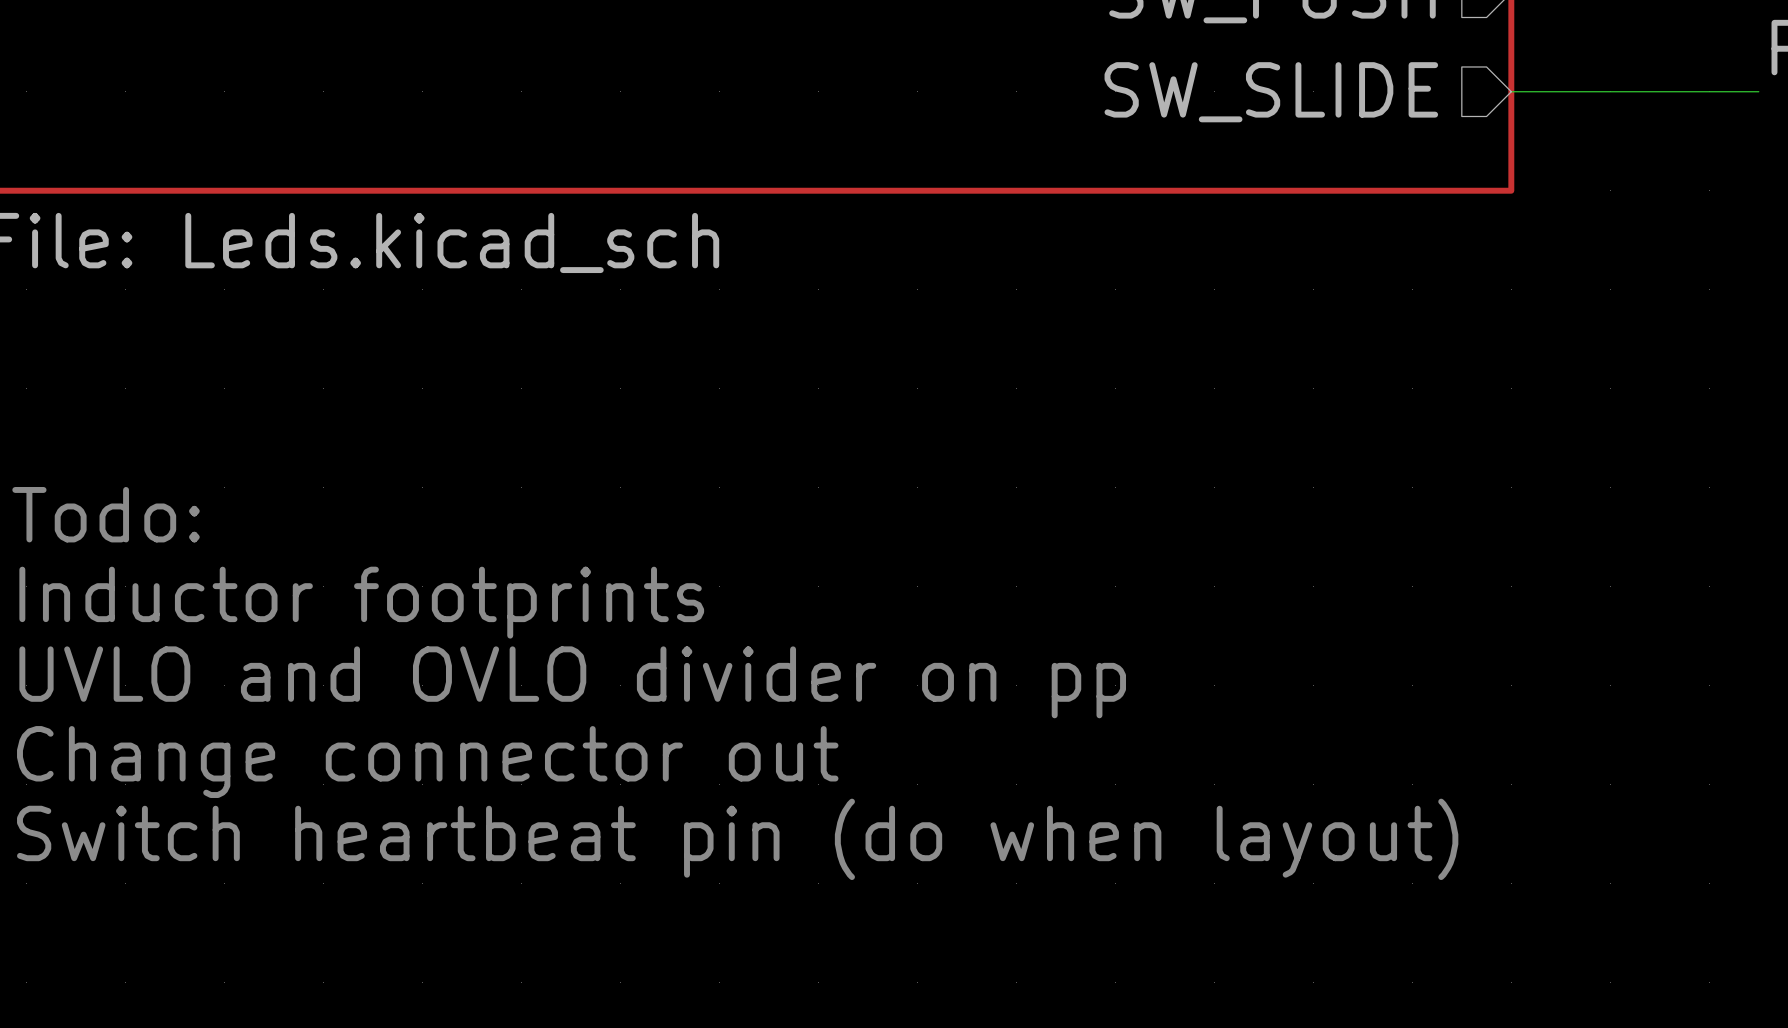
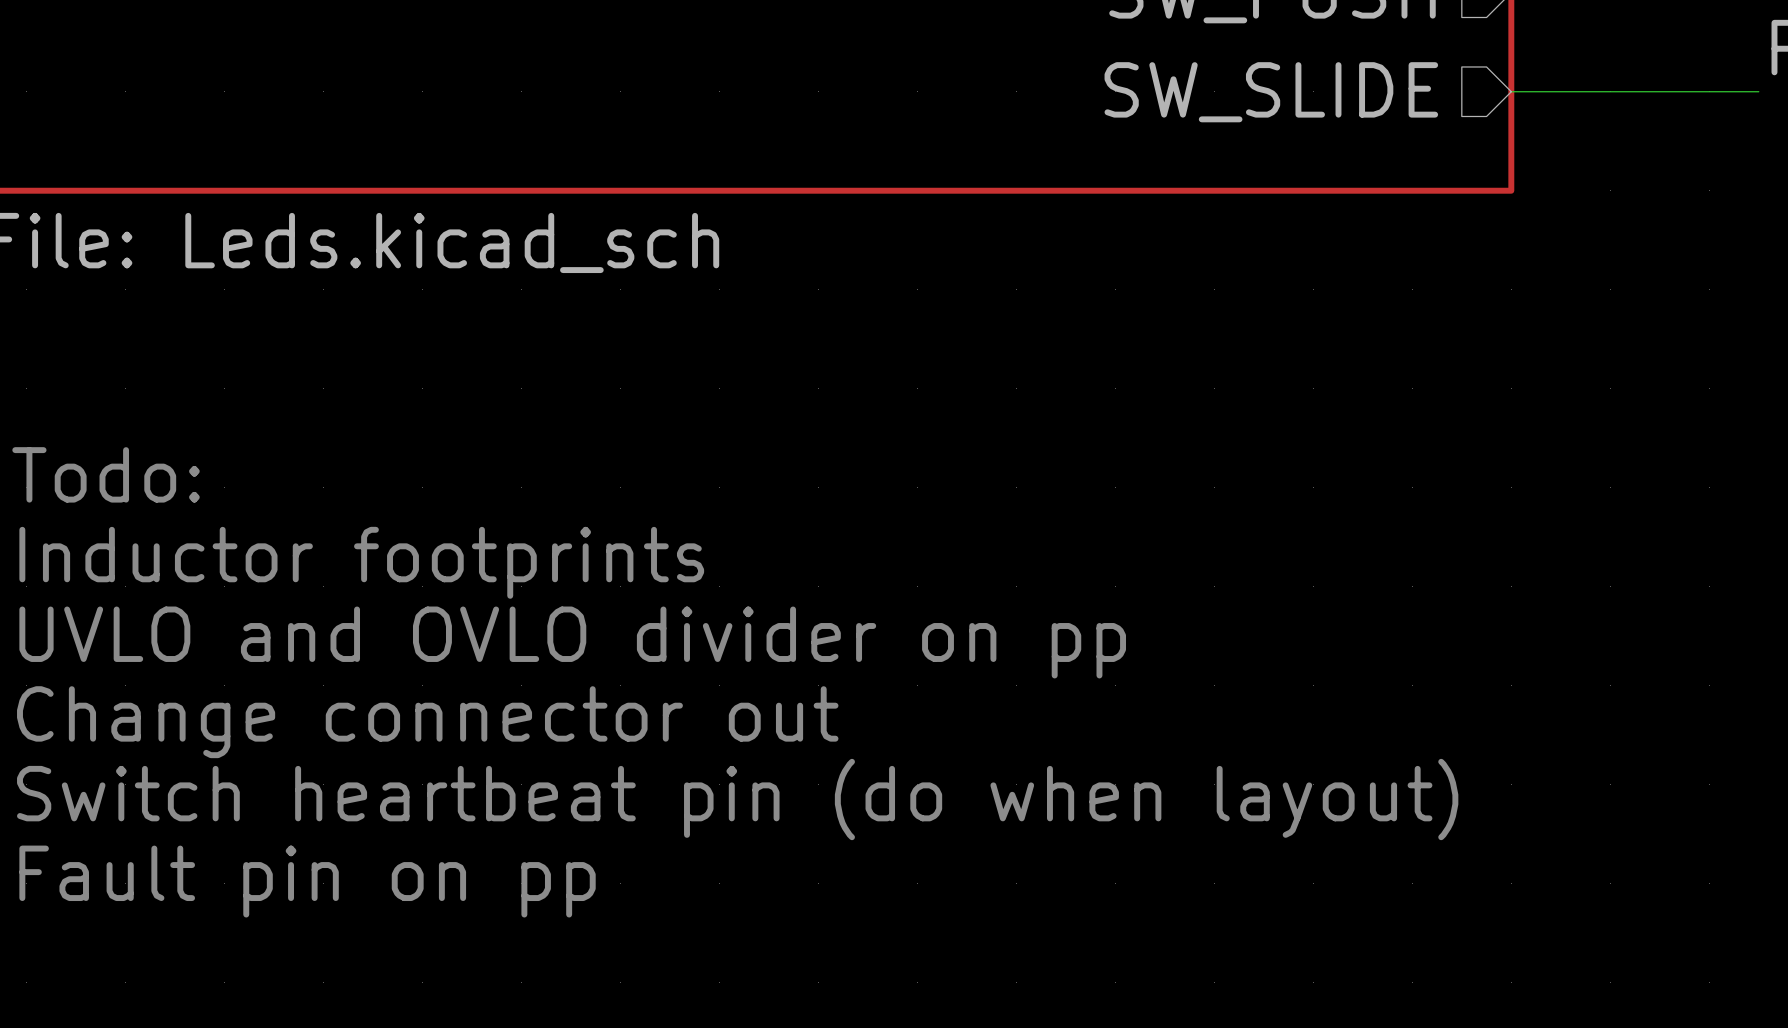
text position: Todo: (106, 514) -> Todo: (106, 474)
text position: Inductor footprints (361, 602) -> Inductor footprints (361, 562)
text position: UVLO and OVLO divider on pp (572, 682) -> UVLO and OVLO divider on pp (572, 642)
text position: Change connector out (427, 762) -> Change connector out (427, 722)
text position: Switch heartbeat pin (do when layout) (737, 839) -> Switch heartbeat pin (do when layout) (737, 799)
text: none -> Fault pin on pp (307, 881)

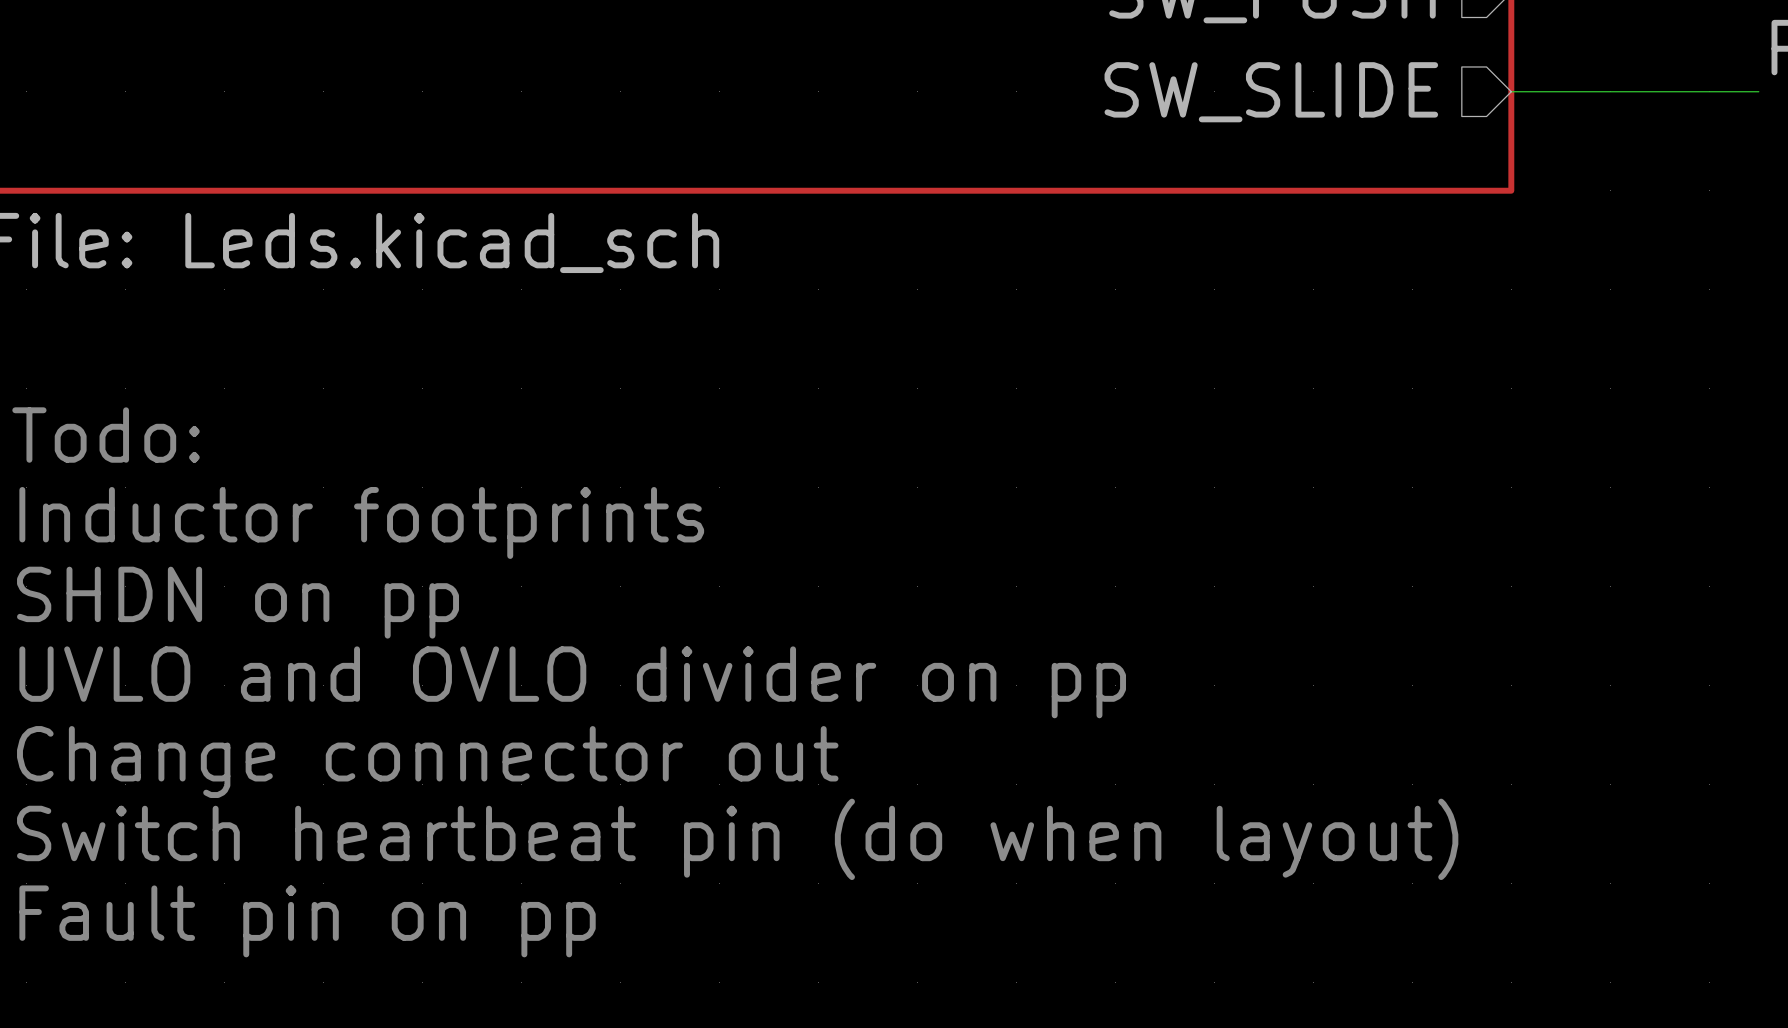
text position: Todo: (106, 474) -> Todo: (106, 435)
text position: Inductor footprints (361, 562) -> Inductor footprints (361, 522)
text: none -> SHDN on pp (238, 602)
text position: UVLO and OVLO divider on pp (572, 642) -> UVLO and OVLO divider on pp (572, 682)
text position: Change connector out (427, 722) -> Change connector out (427, 762)
text position: Switch heartbeat pin (do when layout) (737, 799) -> Switch heartbeat pin (do when layout) (737, 839)
text position: Fault pin on pp (307, 881) -> Fault pin on pp (307, 921)

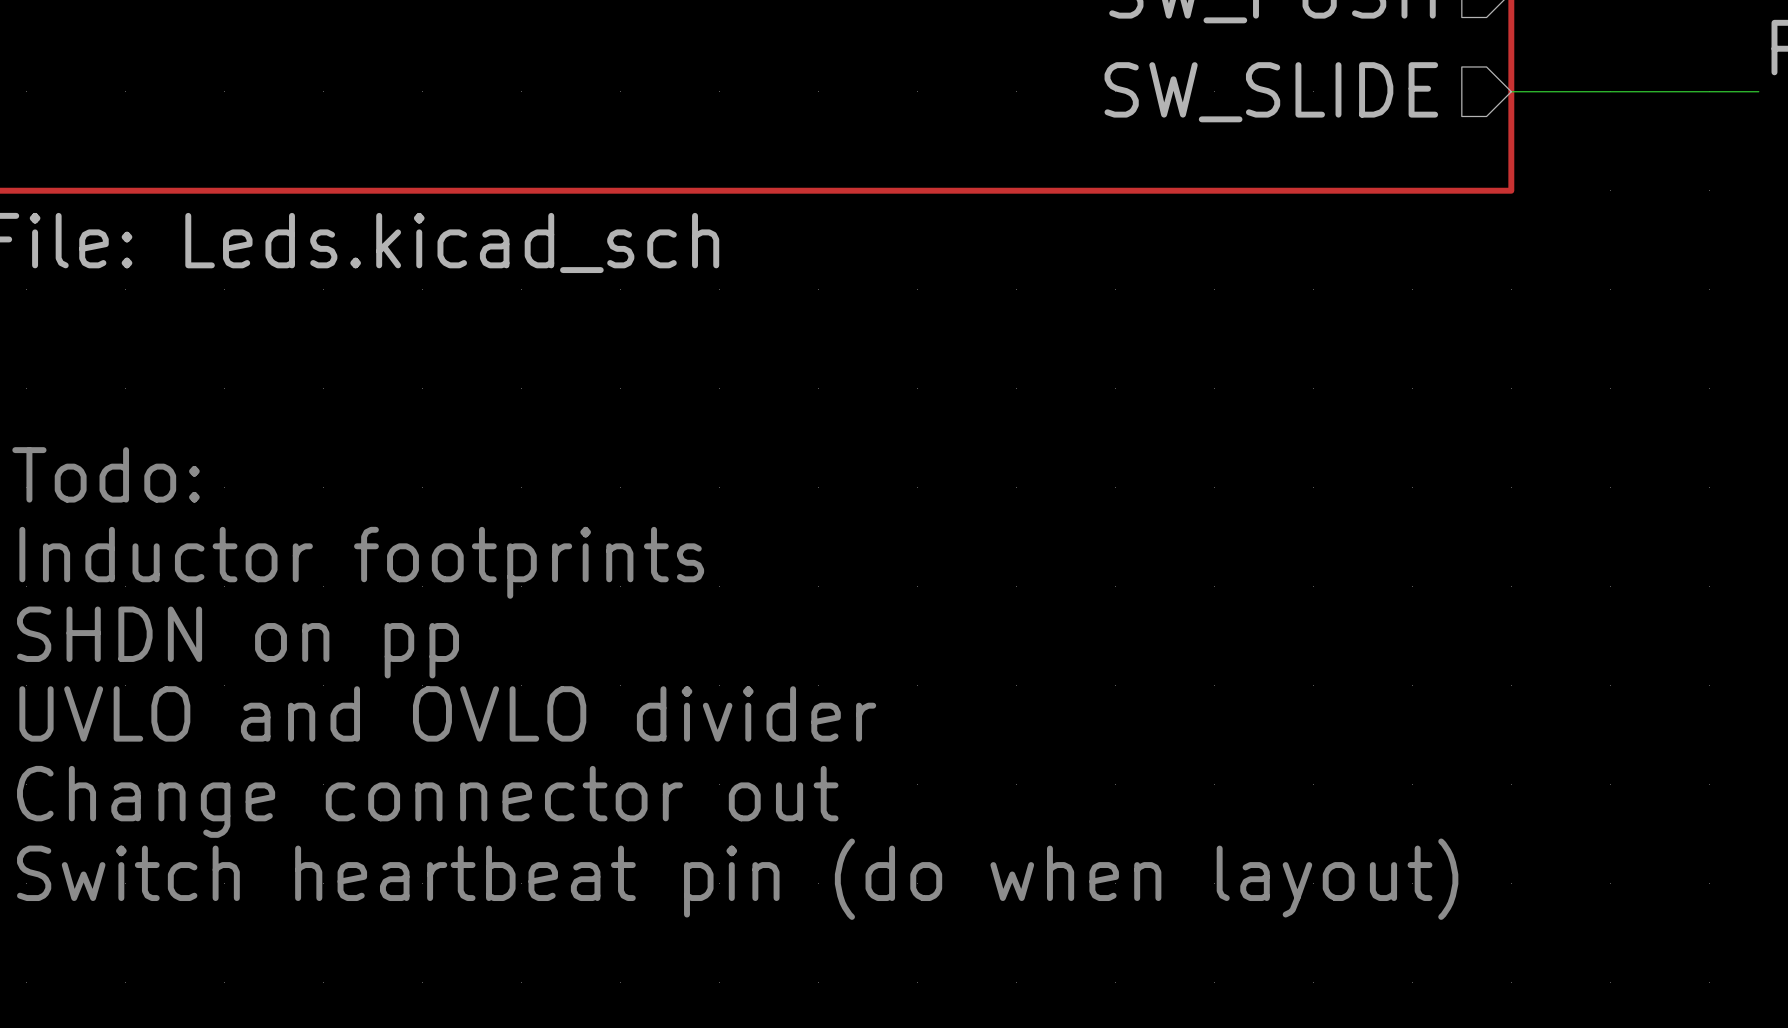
text position: Todo: (106, 435) -> Todo: (106, 474)
text position: Inductor footprints (361, 522) -> Inductor footprints (361, 562)
text position: SHDN on pp (238, 602) -> SHDN on pp (238, 642)
text: UVLO and OVLO divider on pp (572, 682) -> UVLO and OVLO divider (447, 713)
text position: Change connector out (427, 762) -> Change connector out (427, 801)
text position: Switch heartbeat pin (do when layout) (737, 839) -> Switch heartbeat pin (do when layout) (737, 879)
text: Fault pin on pp (307, 921) -> none

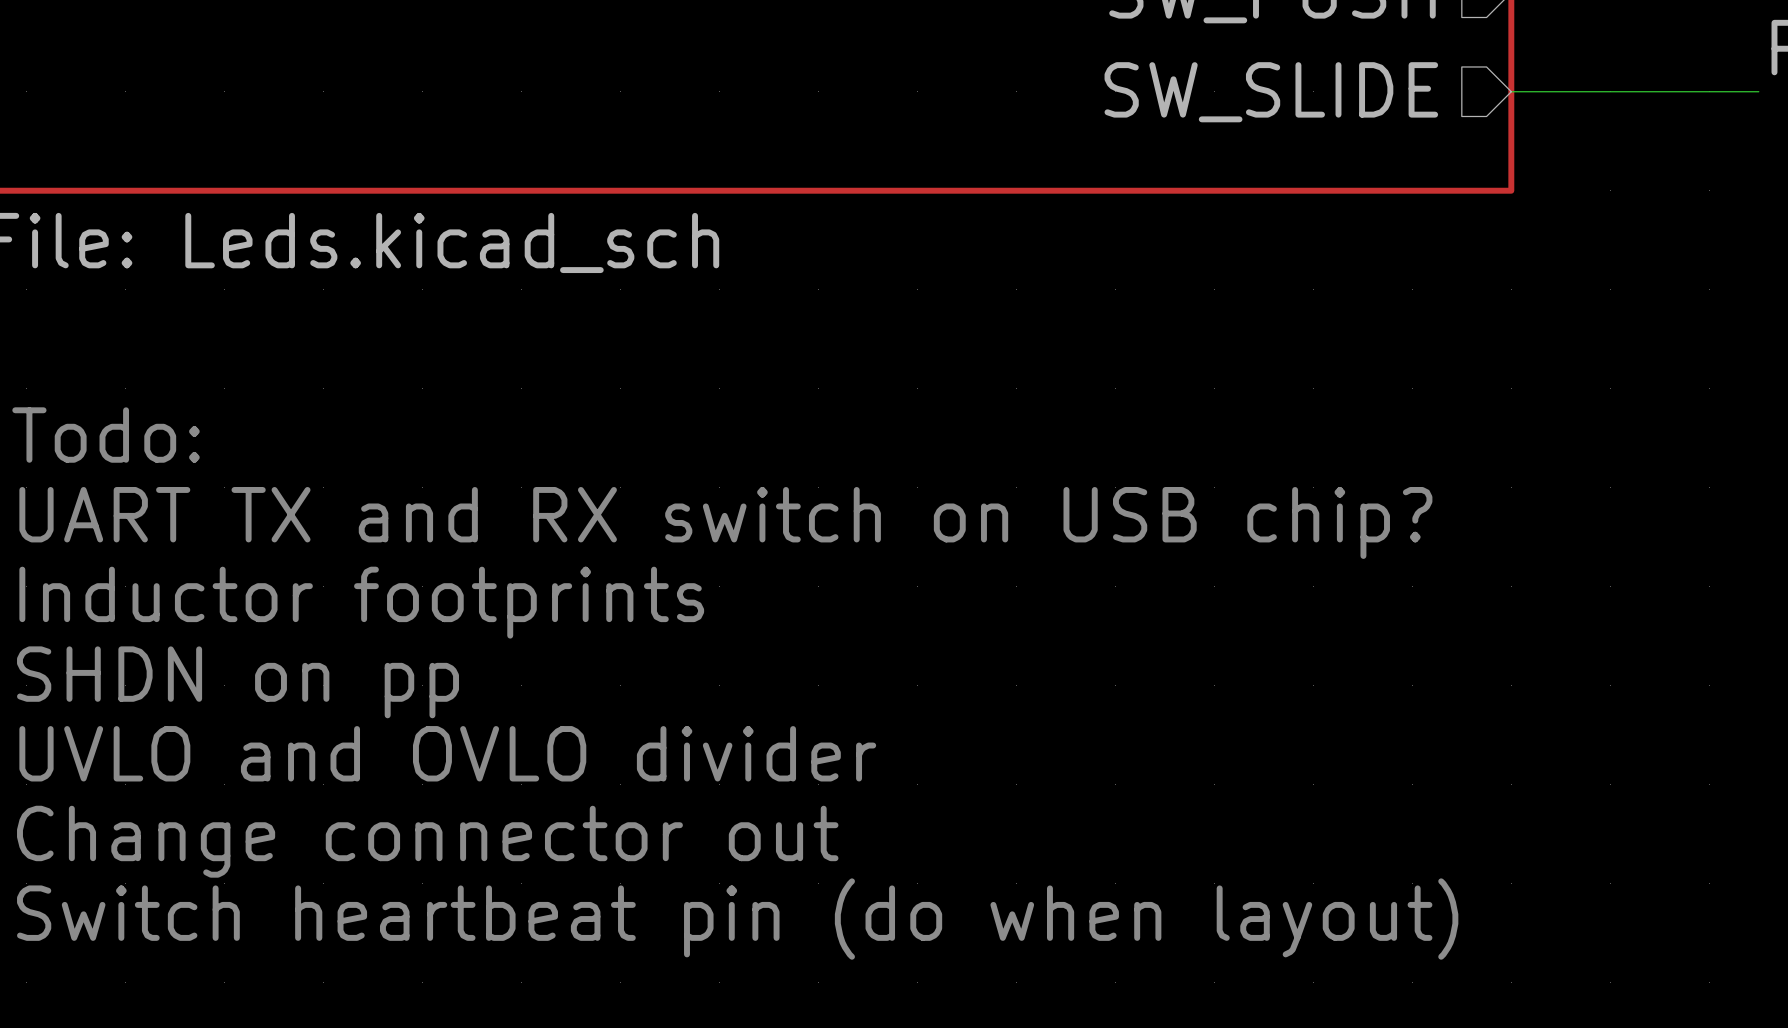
text position: Todo: (106, 474) -> Todo: (106, 435)
text: none -> UART TX and RX switch on USB chip? (725, 522)
text position: Inductor footprints (361, 562) -> Inductor footprints (361, 602)
text position: SHDN on pp (238, 642) -> SHDN on pp (238, 682)
text position: UVLO and OVLO divider (447, 713) -> UVLO and OVLO divider (447, 753)
text position: Change connector out (427, 801) -> Change connector out (427, 841)
text position: Switch heartbeat pin (do when layout) (737, 879) -> Switch heartbeat pin (do when layout) (737, 919)

